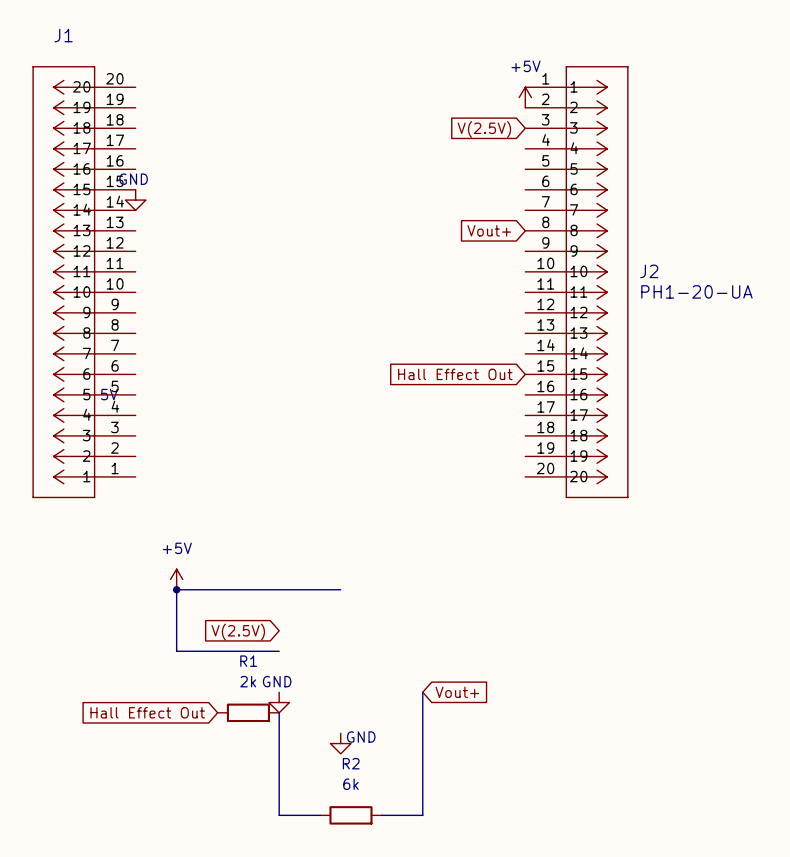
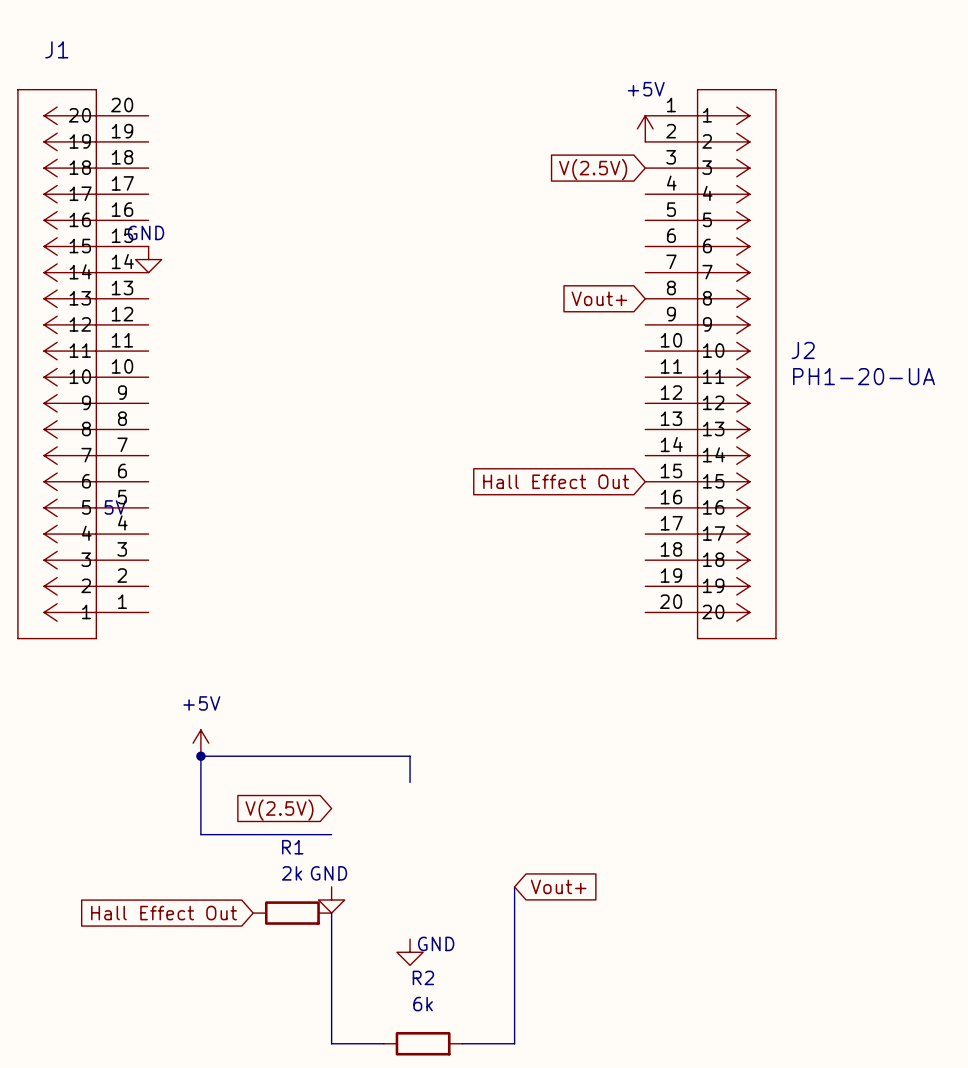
wire: none -> (410, 756) (410, 782)

